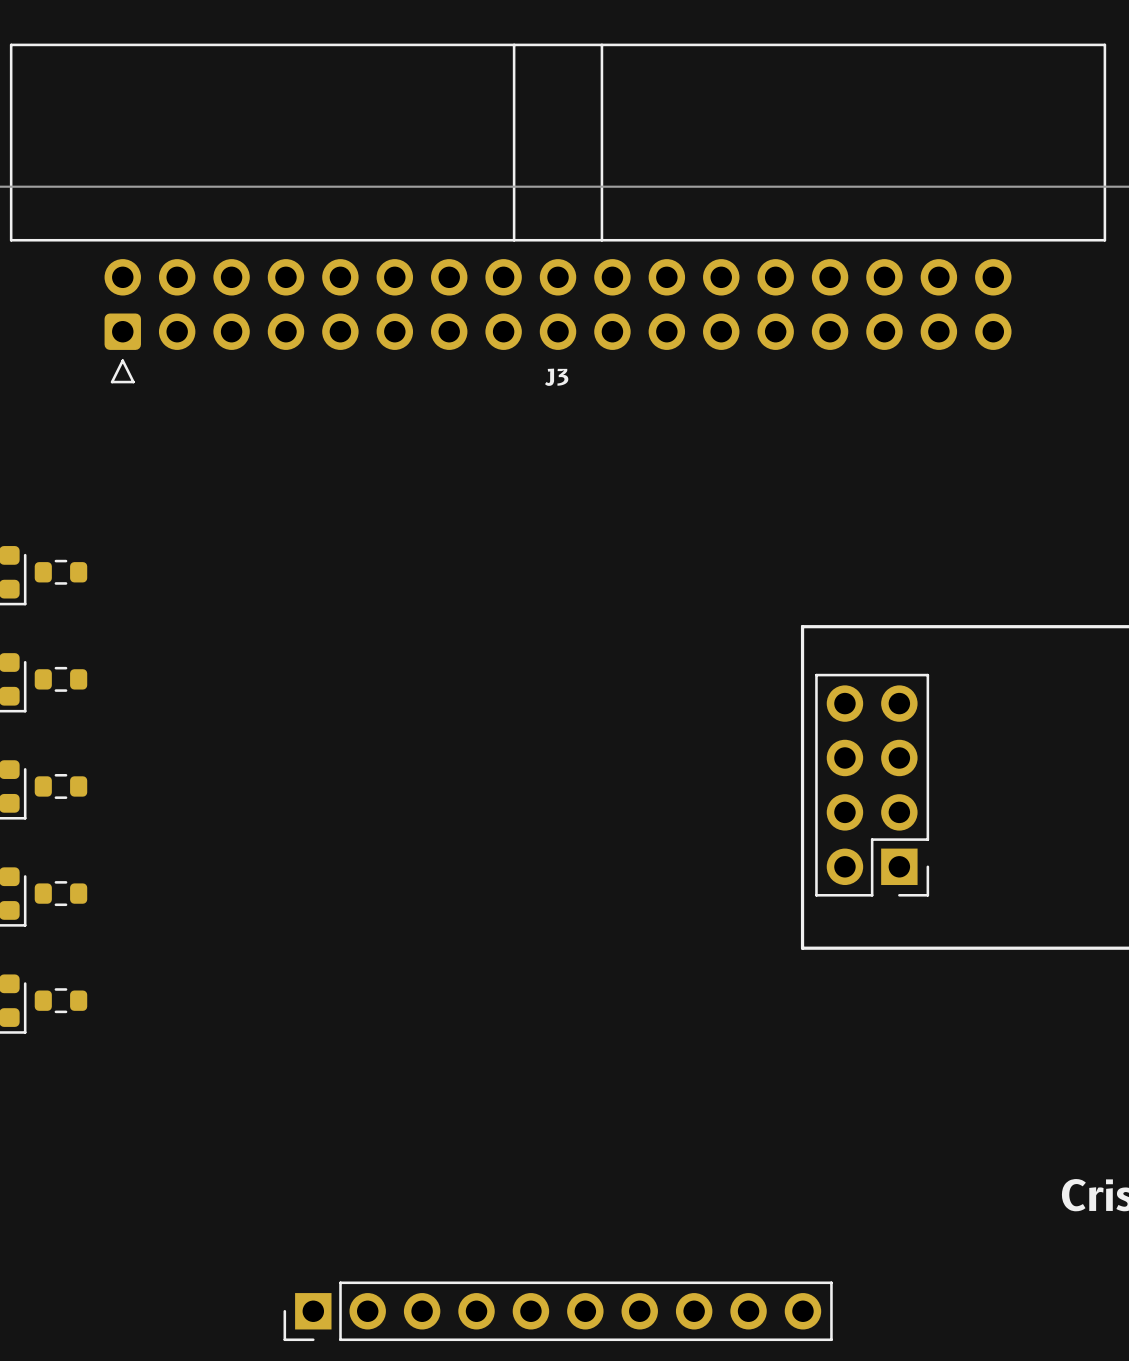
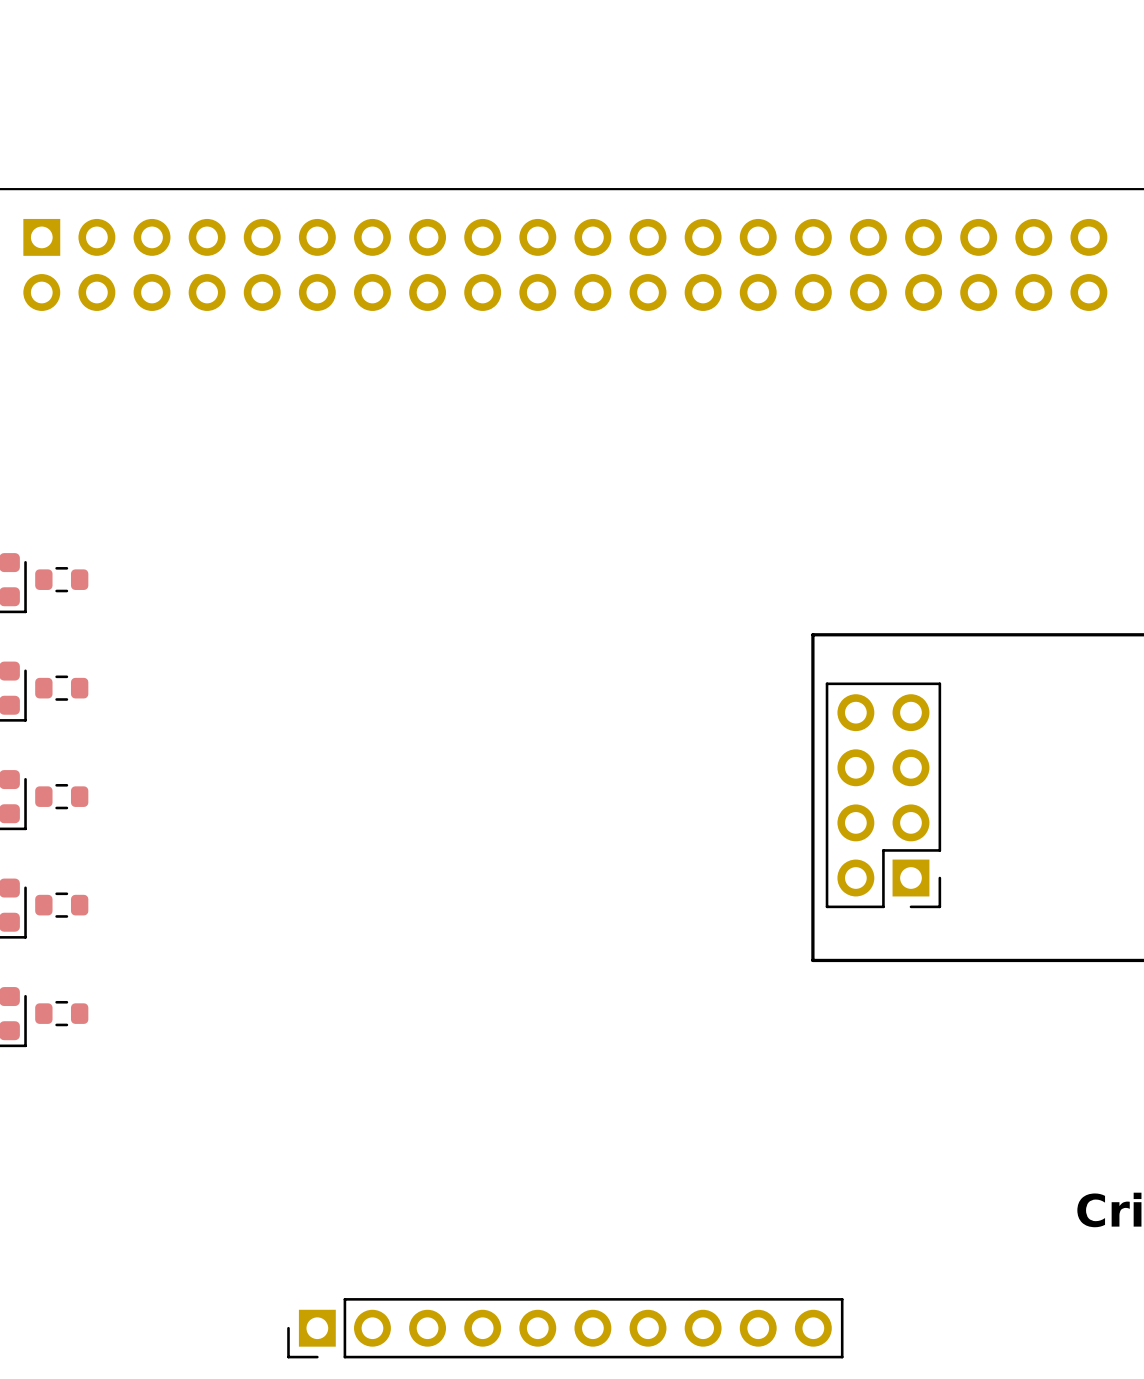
J3: (558, 213) -> none
part: none -> (565, 264)

